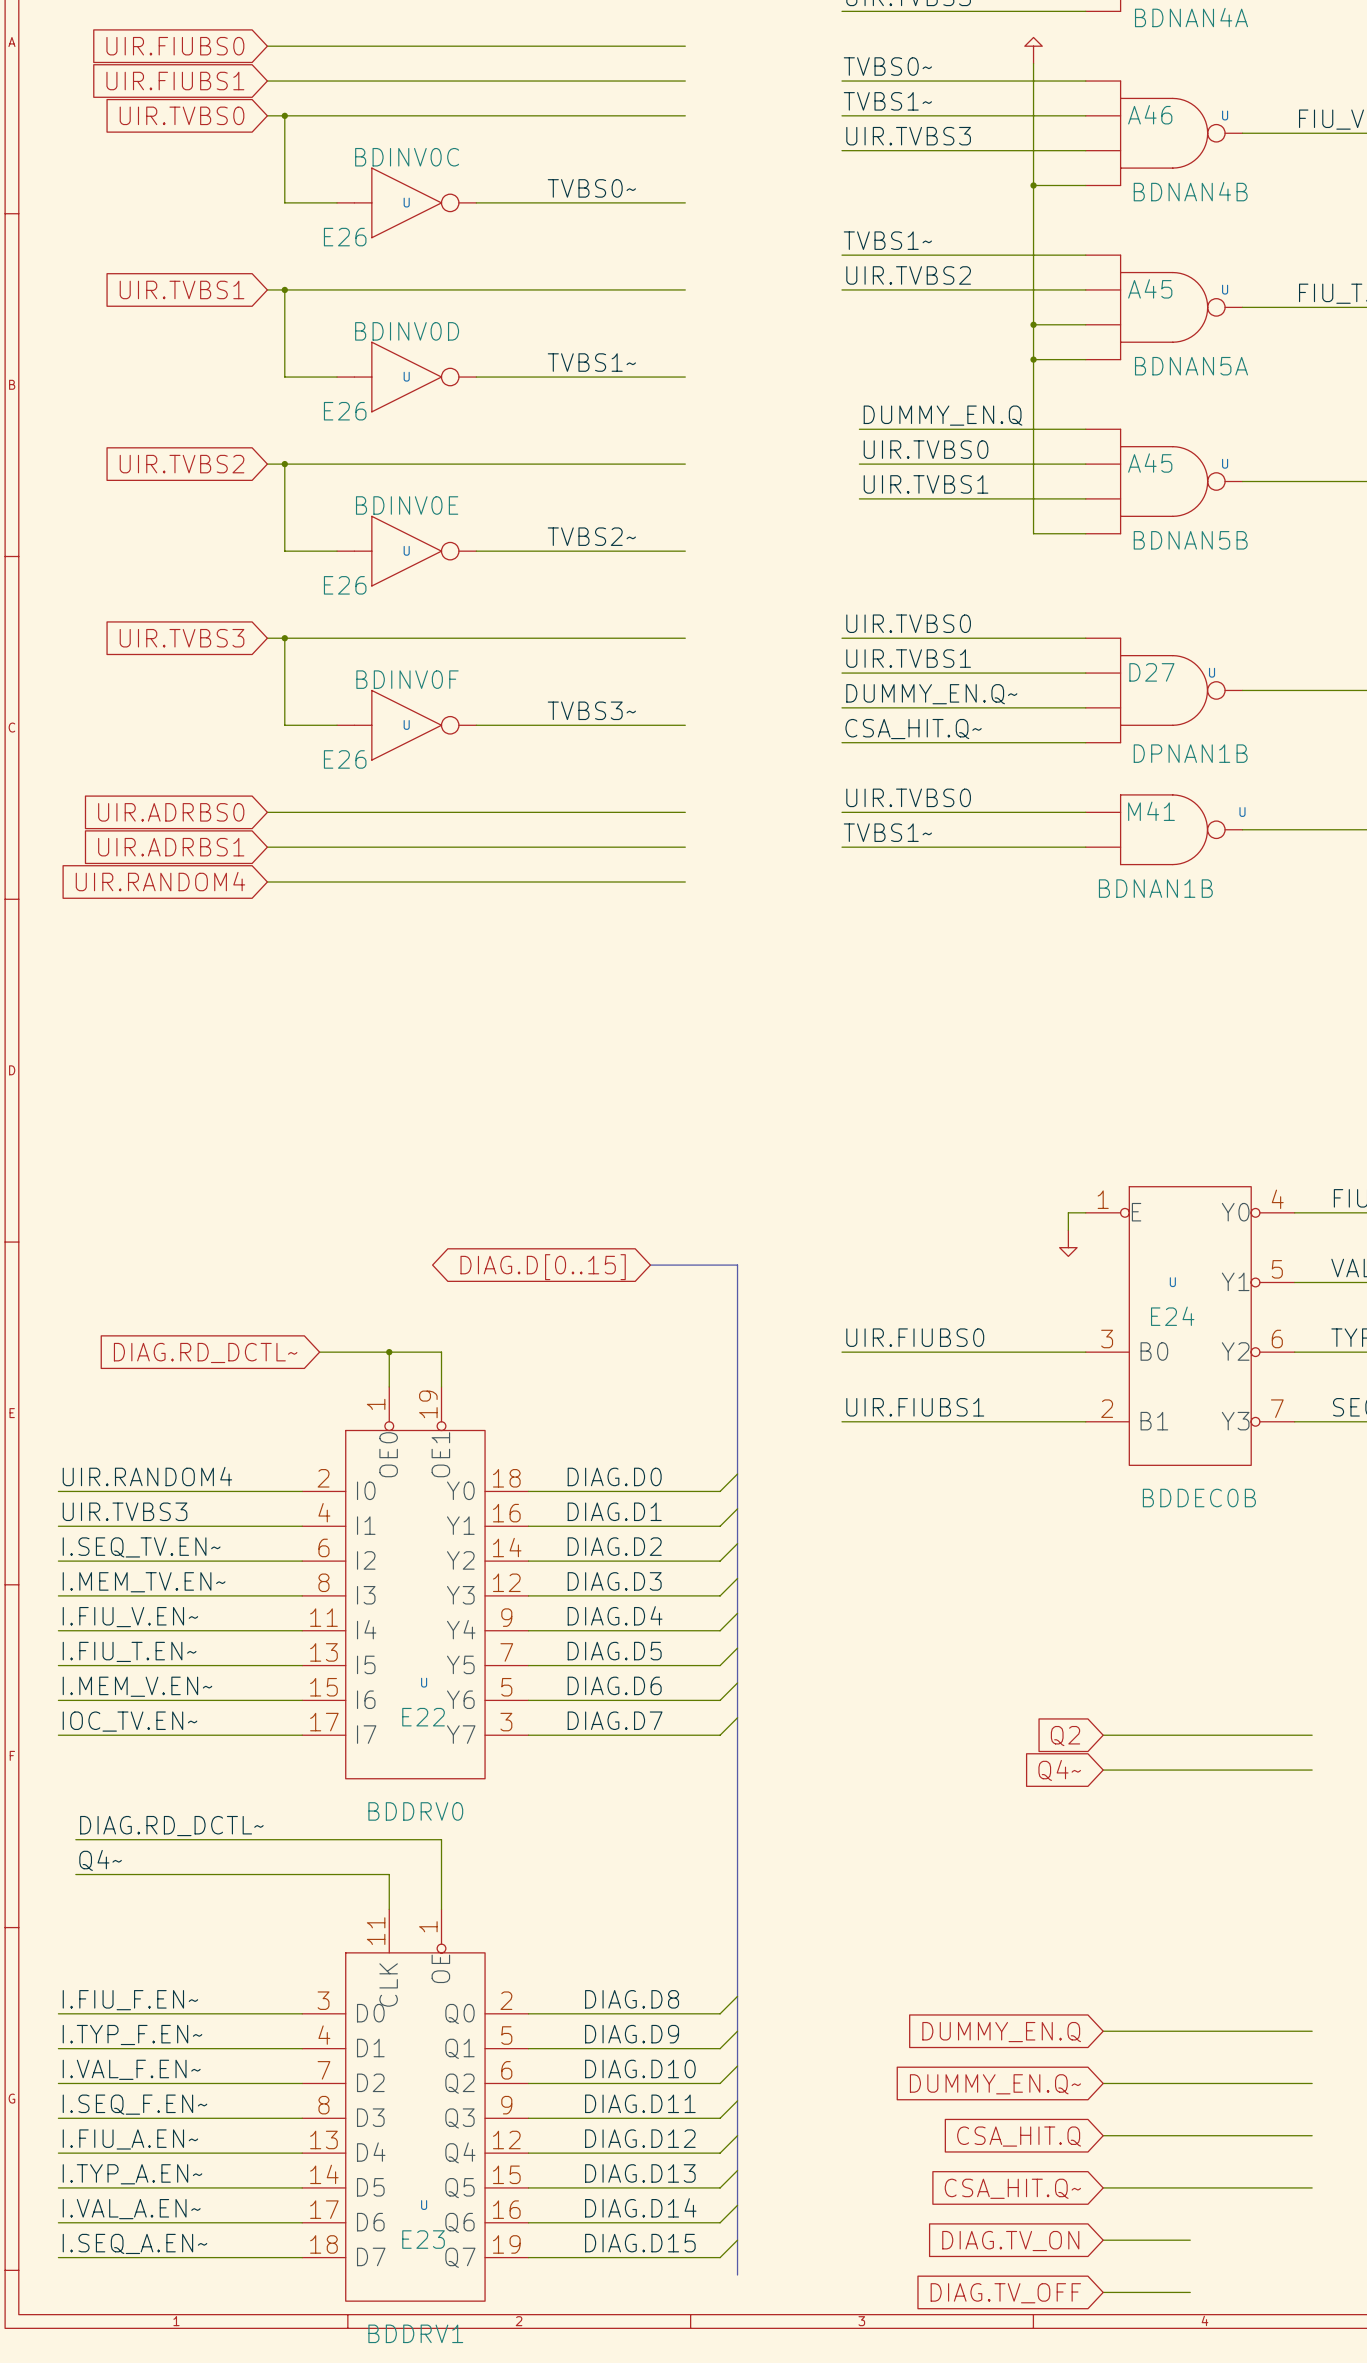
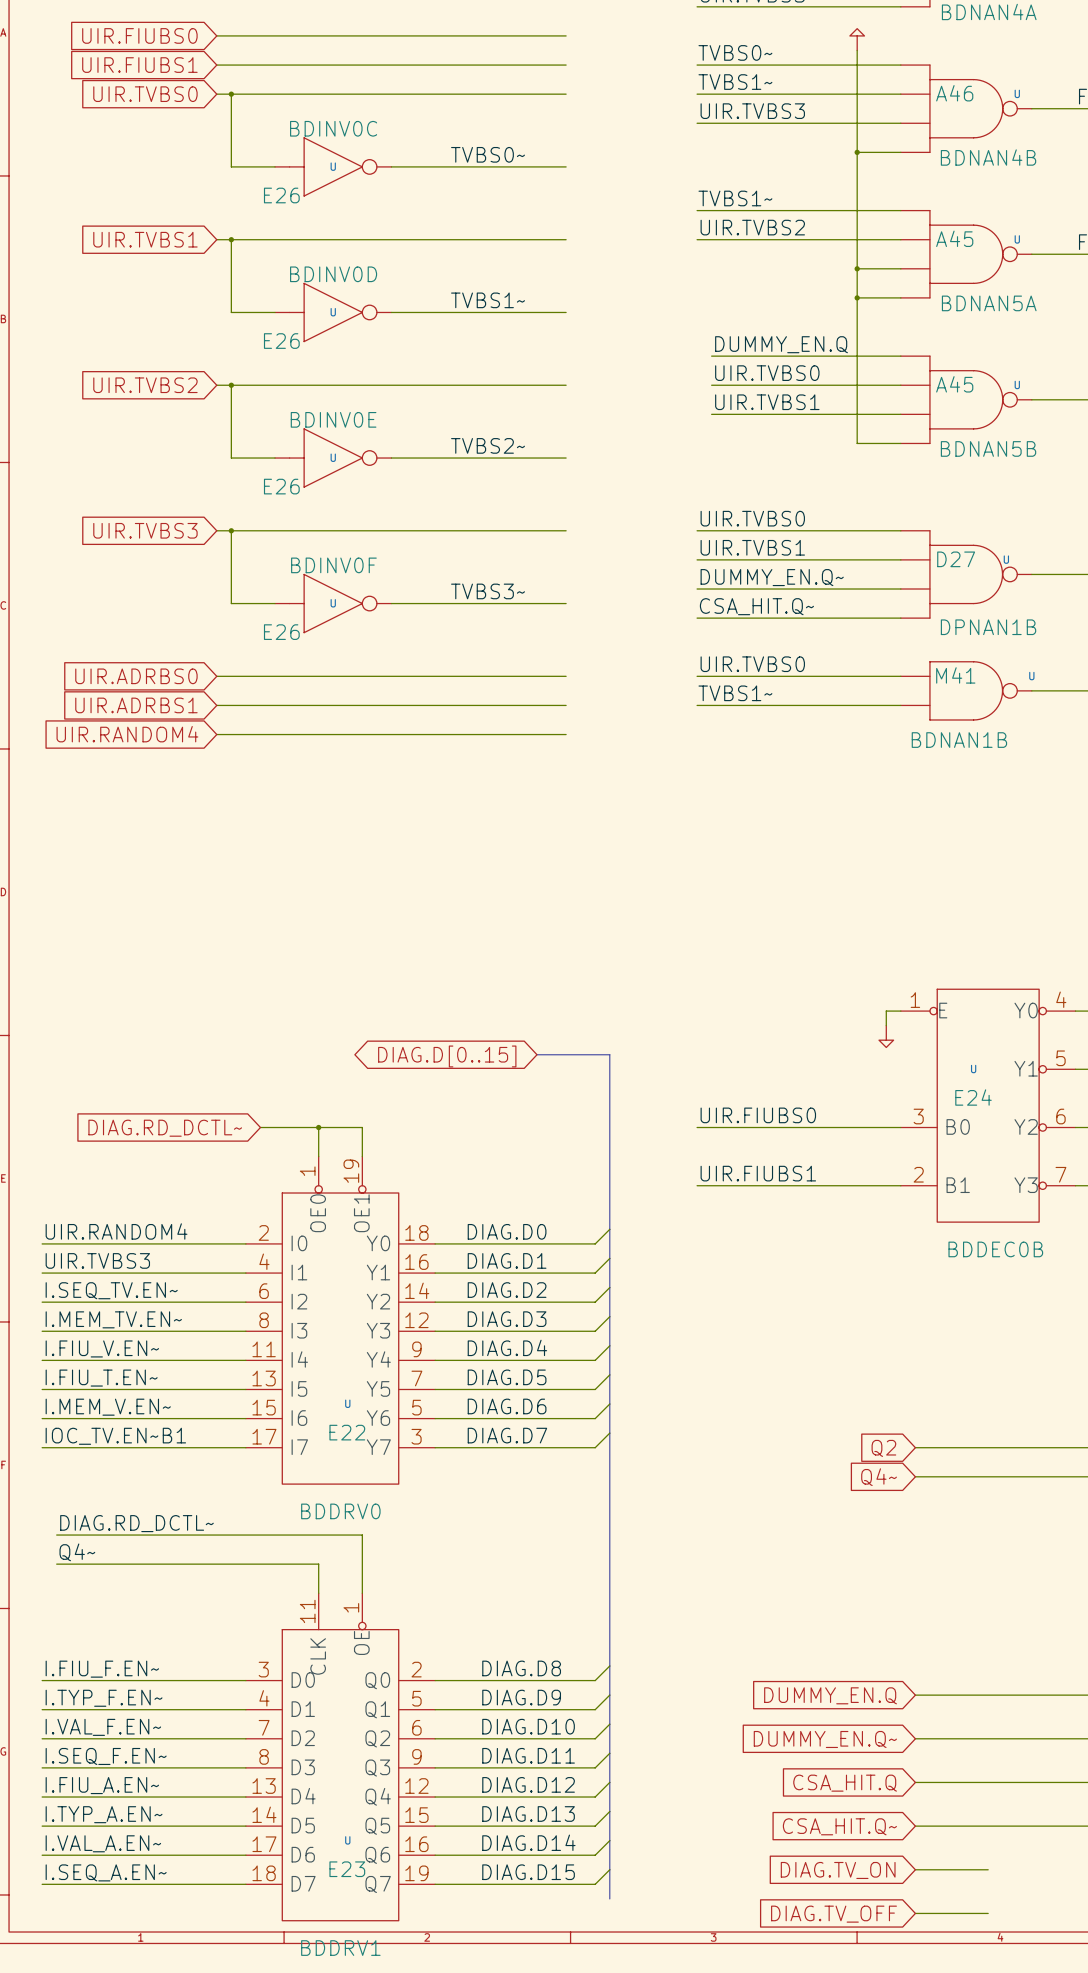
label: IOC_TV.EN~ (130, 1721) -> IOC_TV.EN~B1 (115, 1436)

